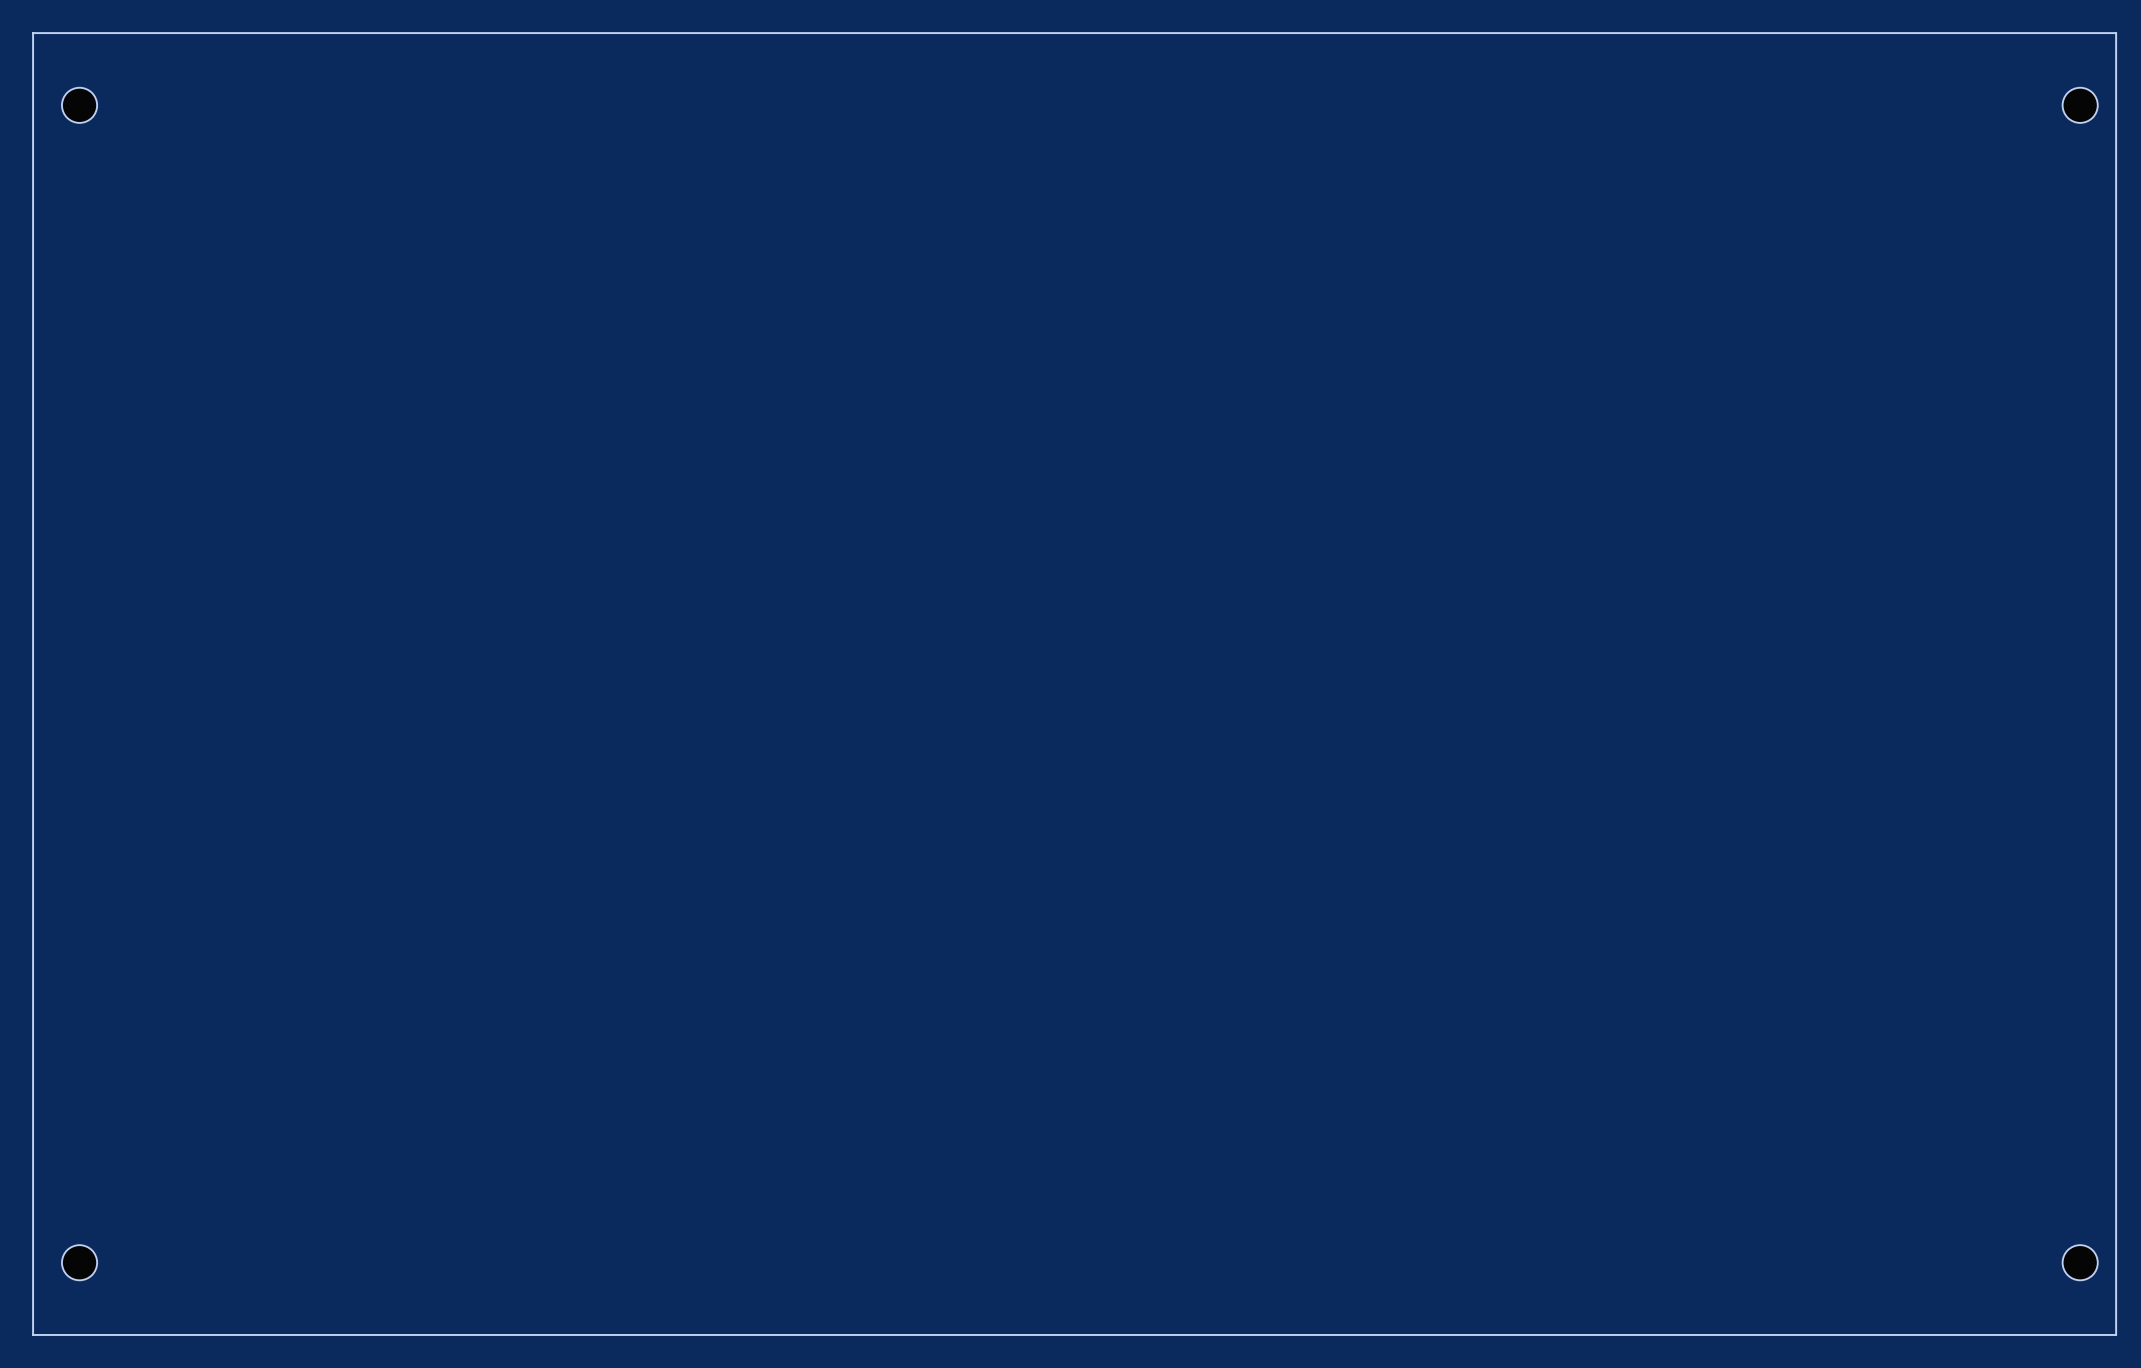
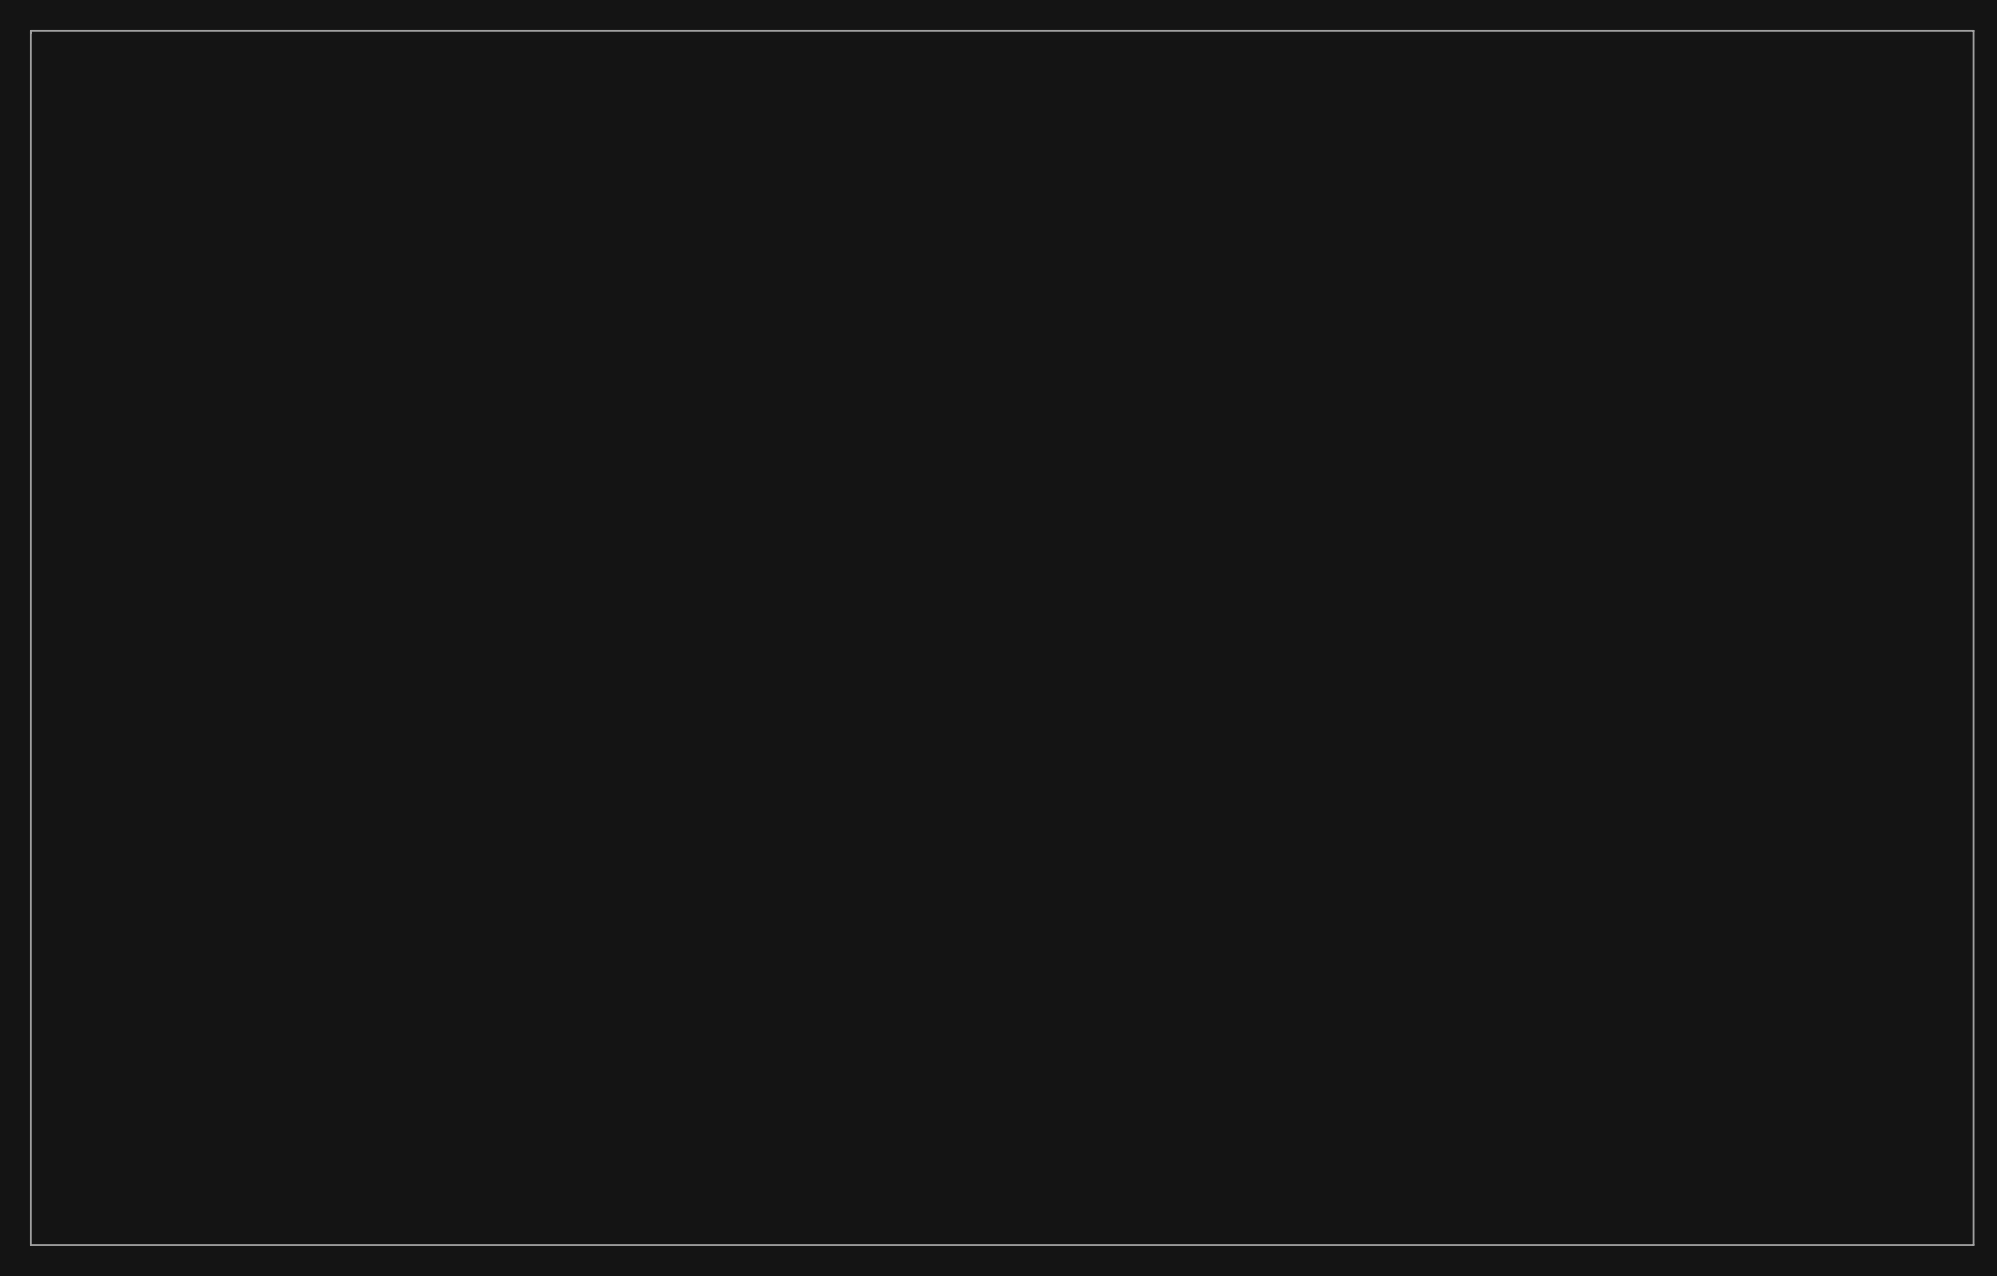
part: (79, 105) -> none
part: (2080, 105) -> none
part: (79, 1262) -> none
part: (2080, 1262) -> none

